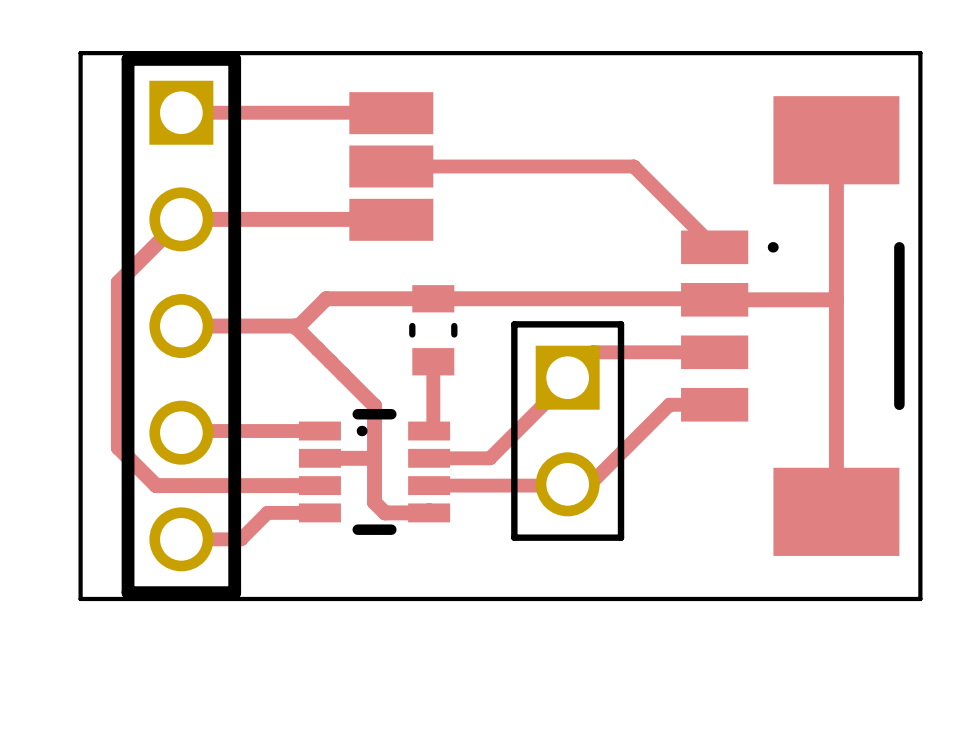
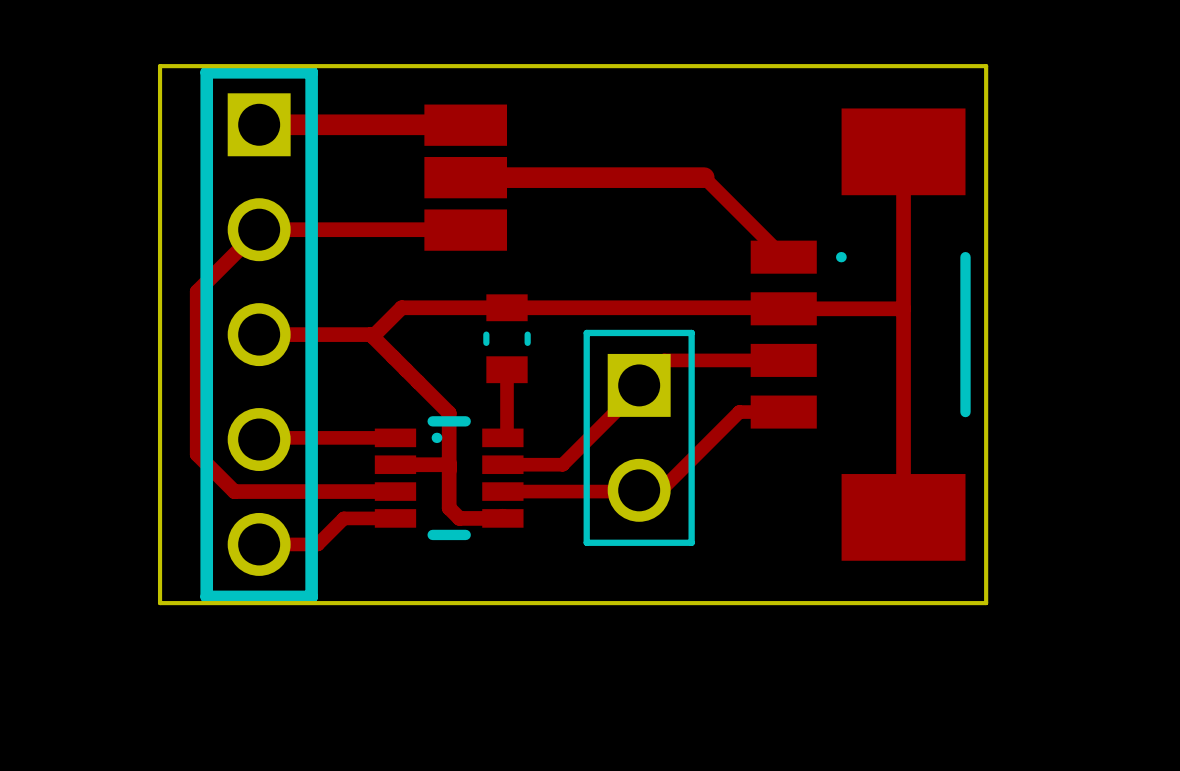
top track width: thin (181, 112) (390, 112) -> thick (259, 124) (465, 124)
top track width: thin (391, 166) (633, 166) -> thick (465, 177) (704, 177)

